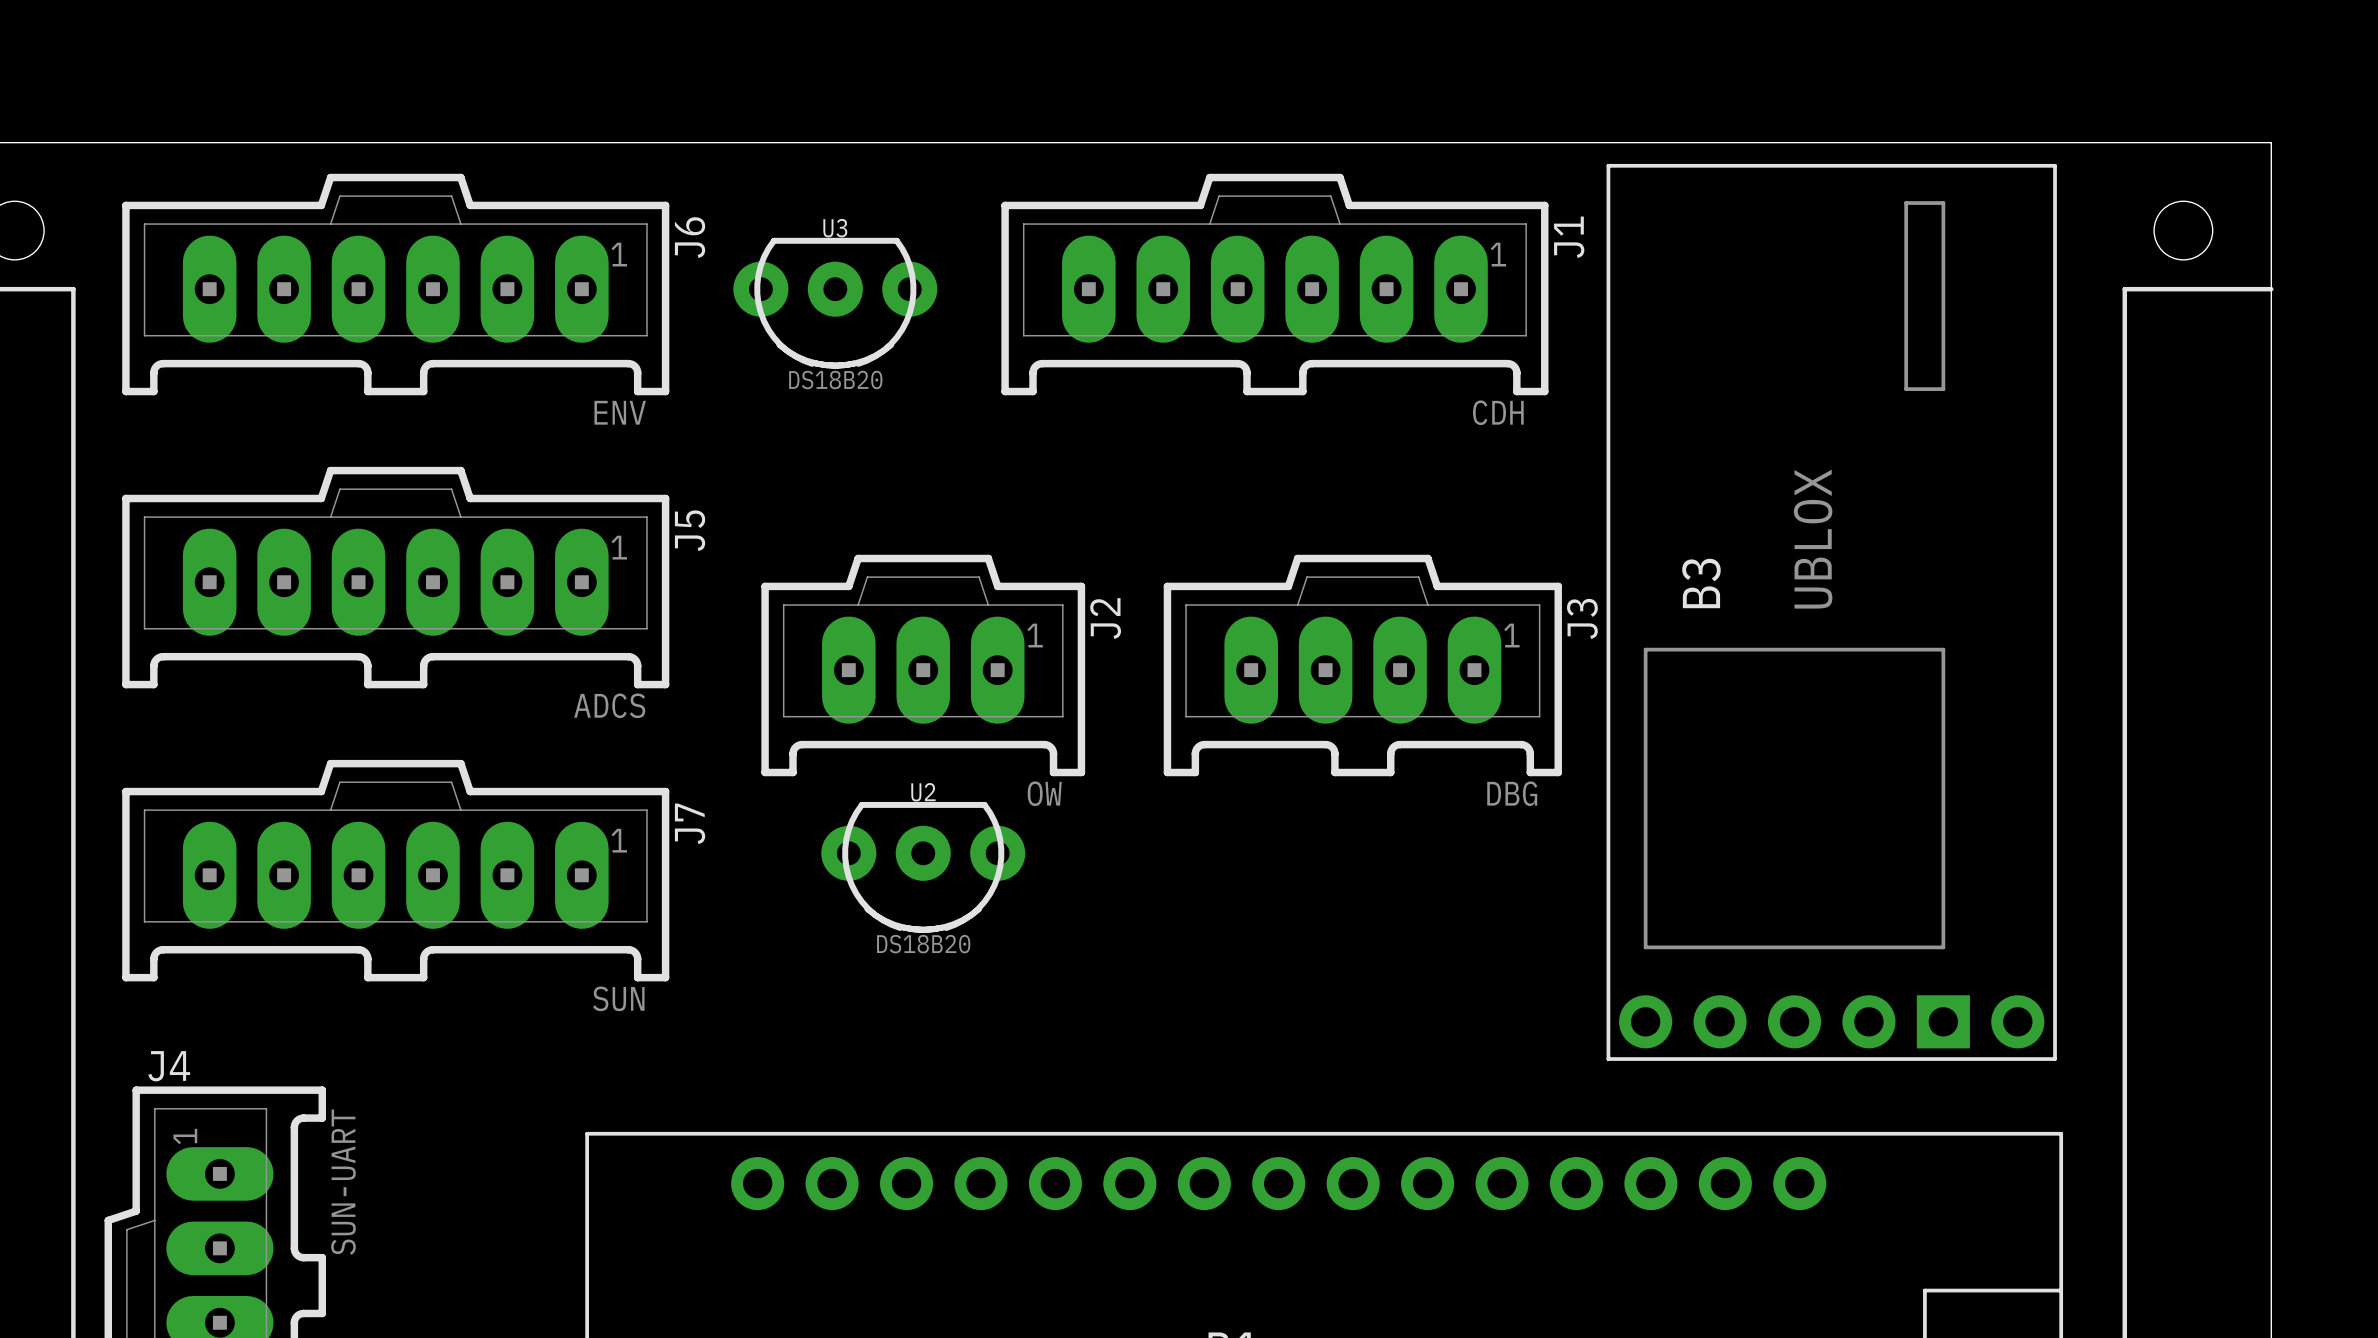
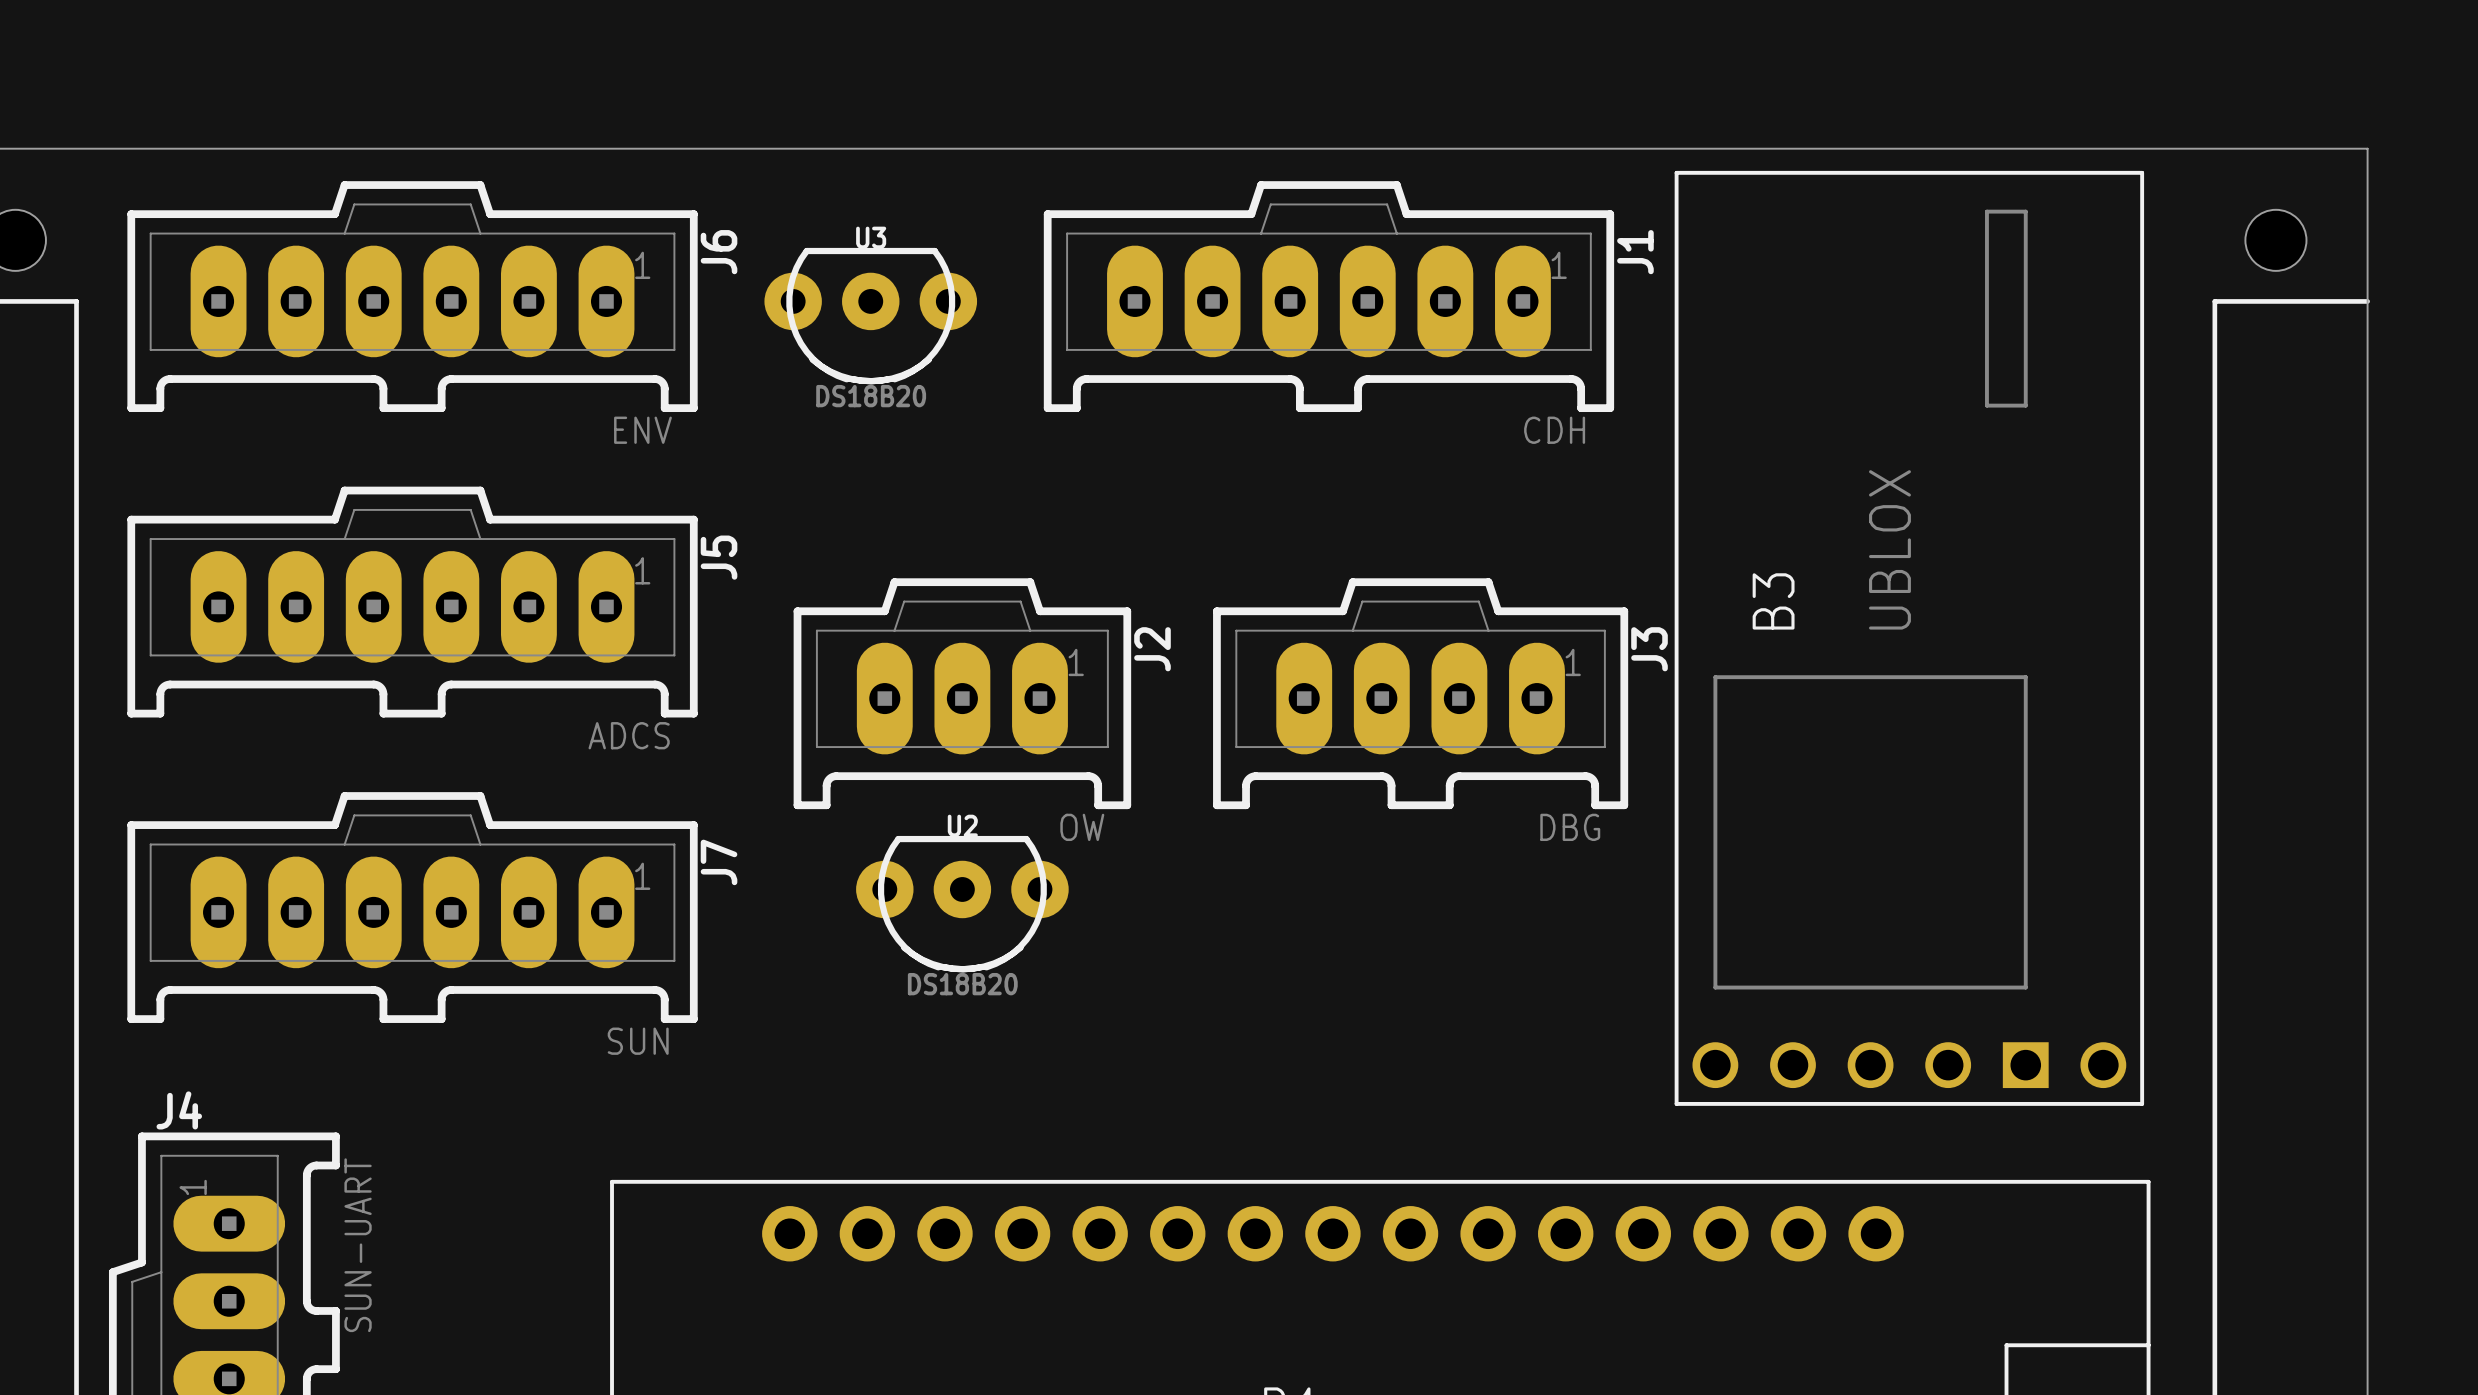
B3 footprint: [1606, 163, 2057, 1061] -> [1674, 170, 2145, 1106]

